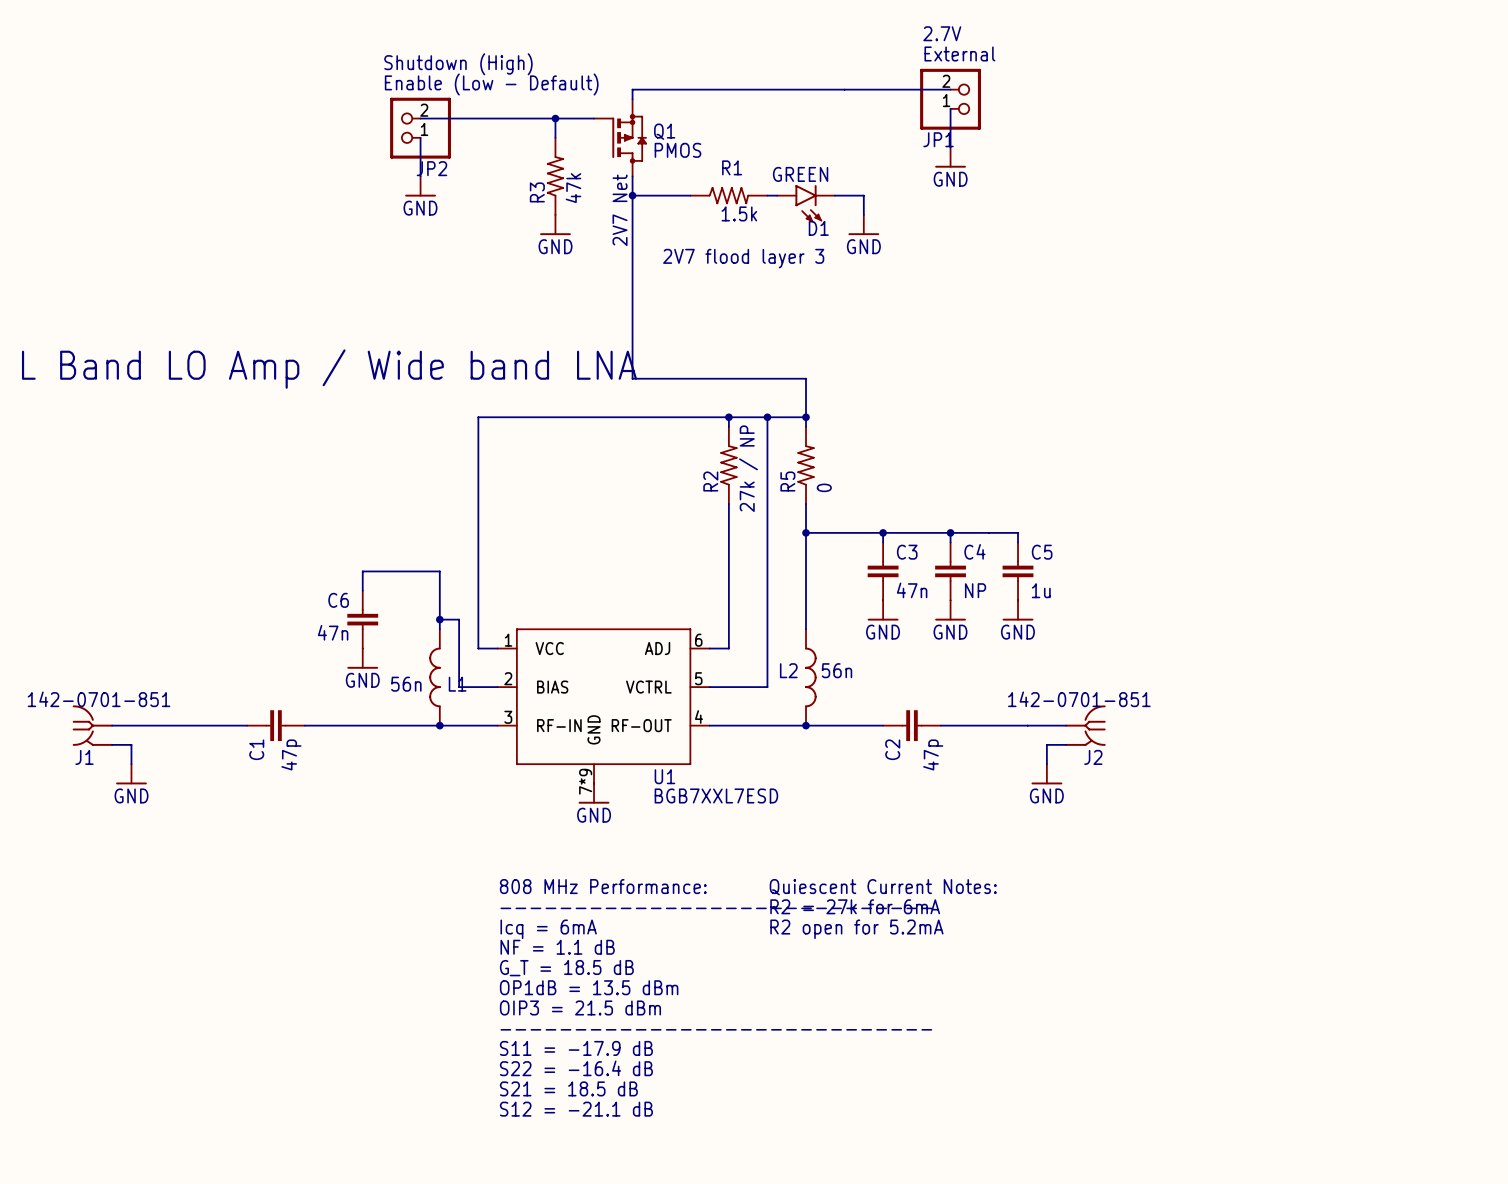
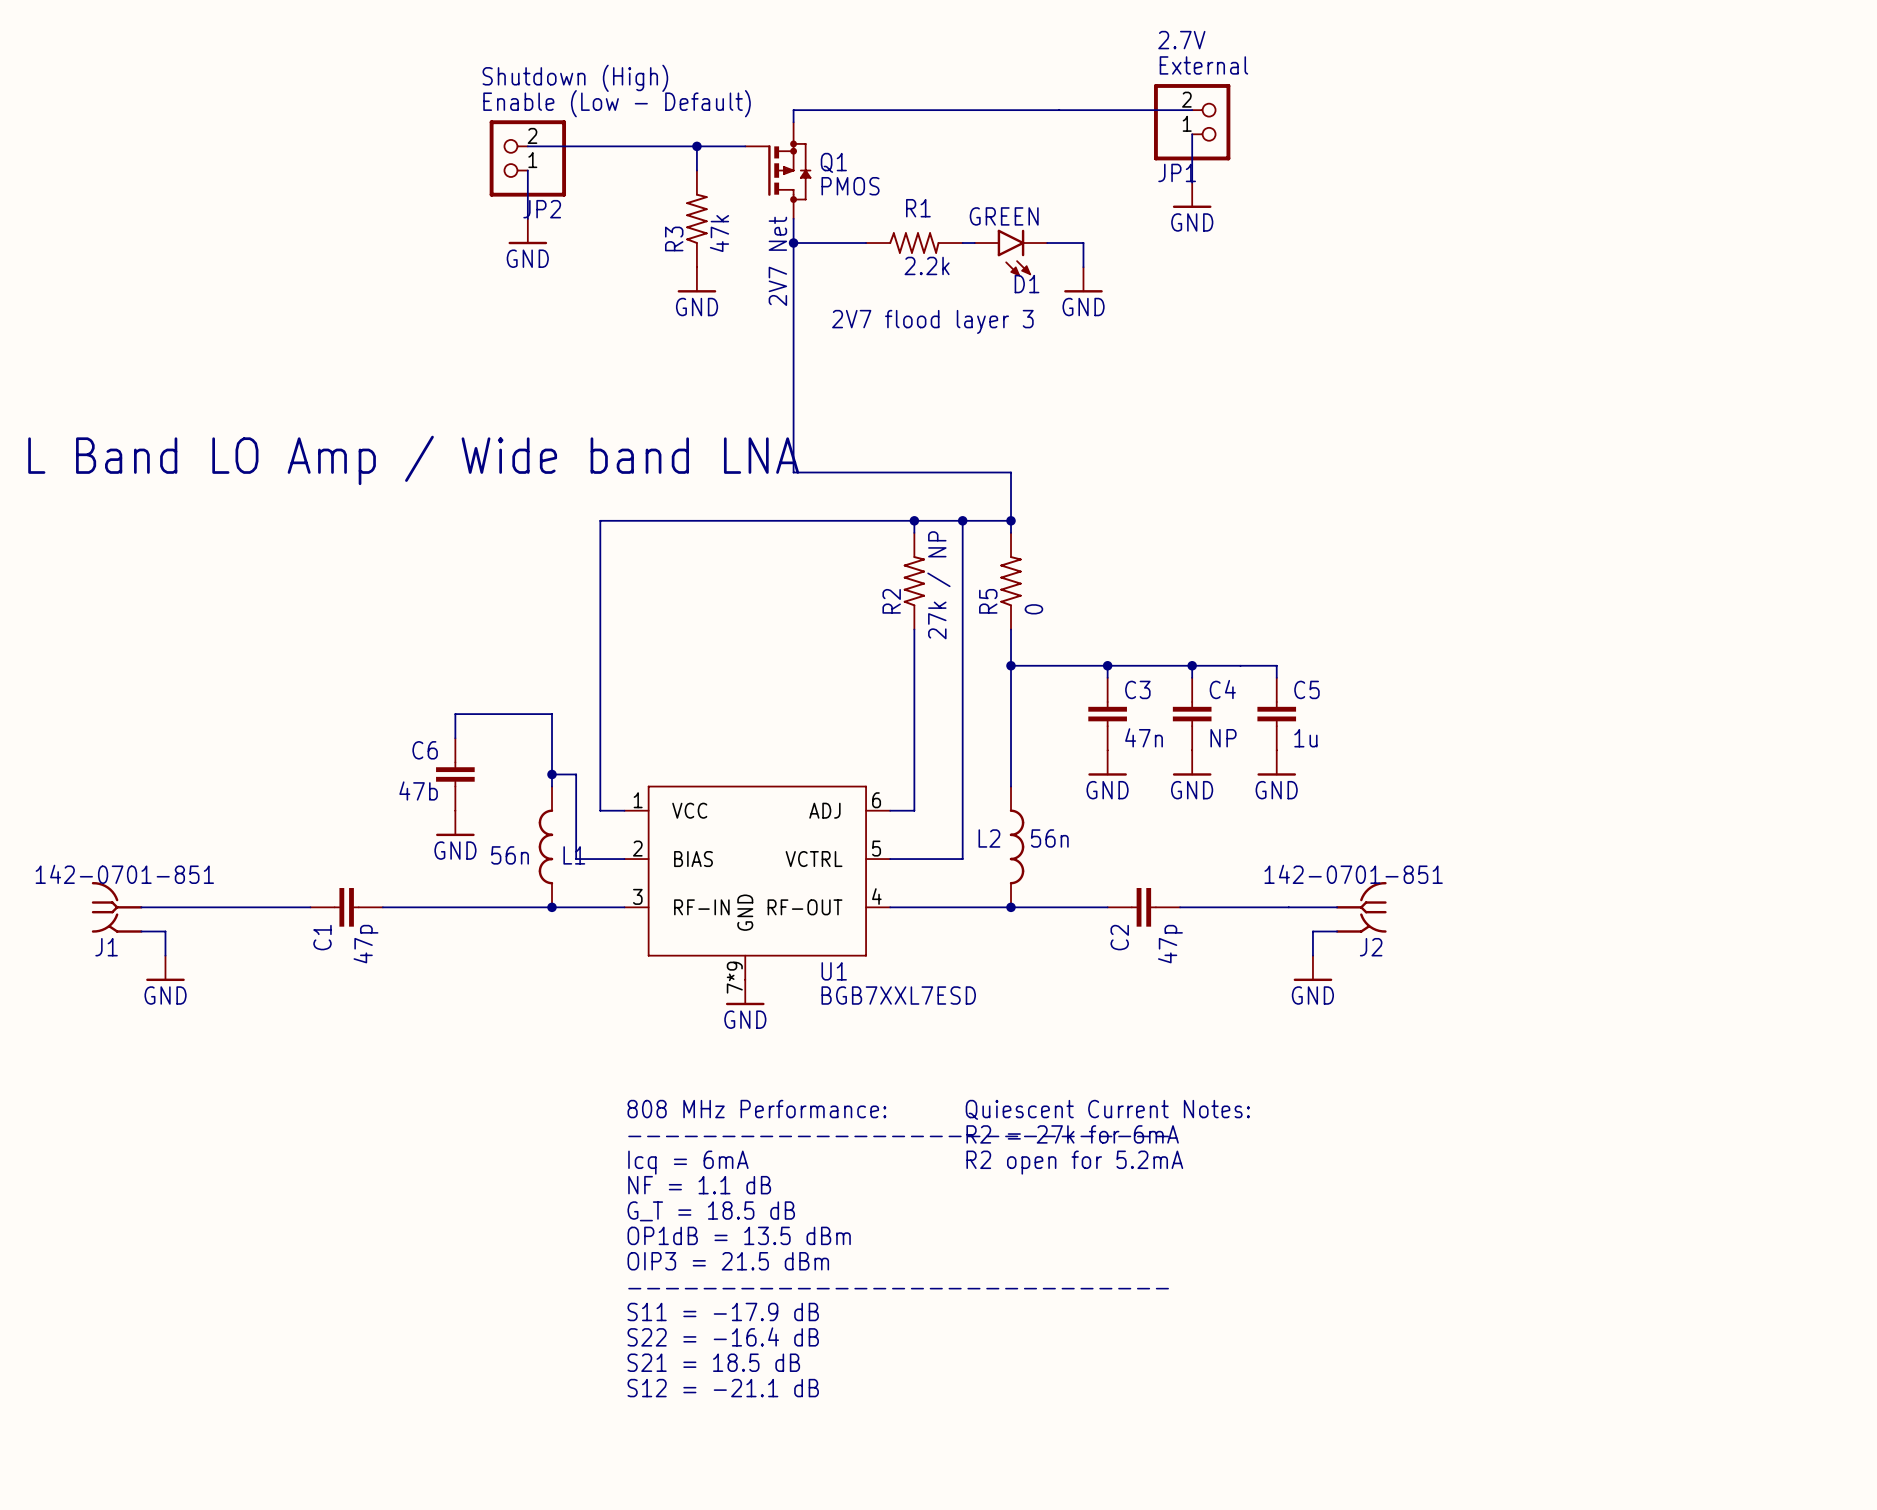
R1 value: 1.5k (739, 213) -> 2.2k (927, 265)
C6 value: 47n (333, 632) -> 47b (418, 790)

